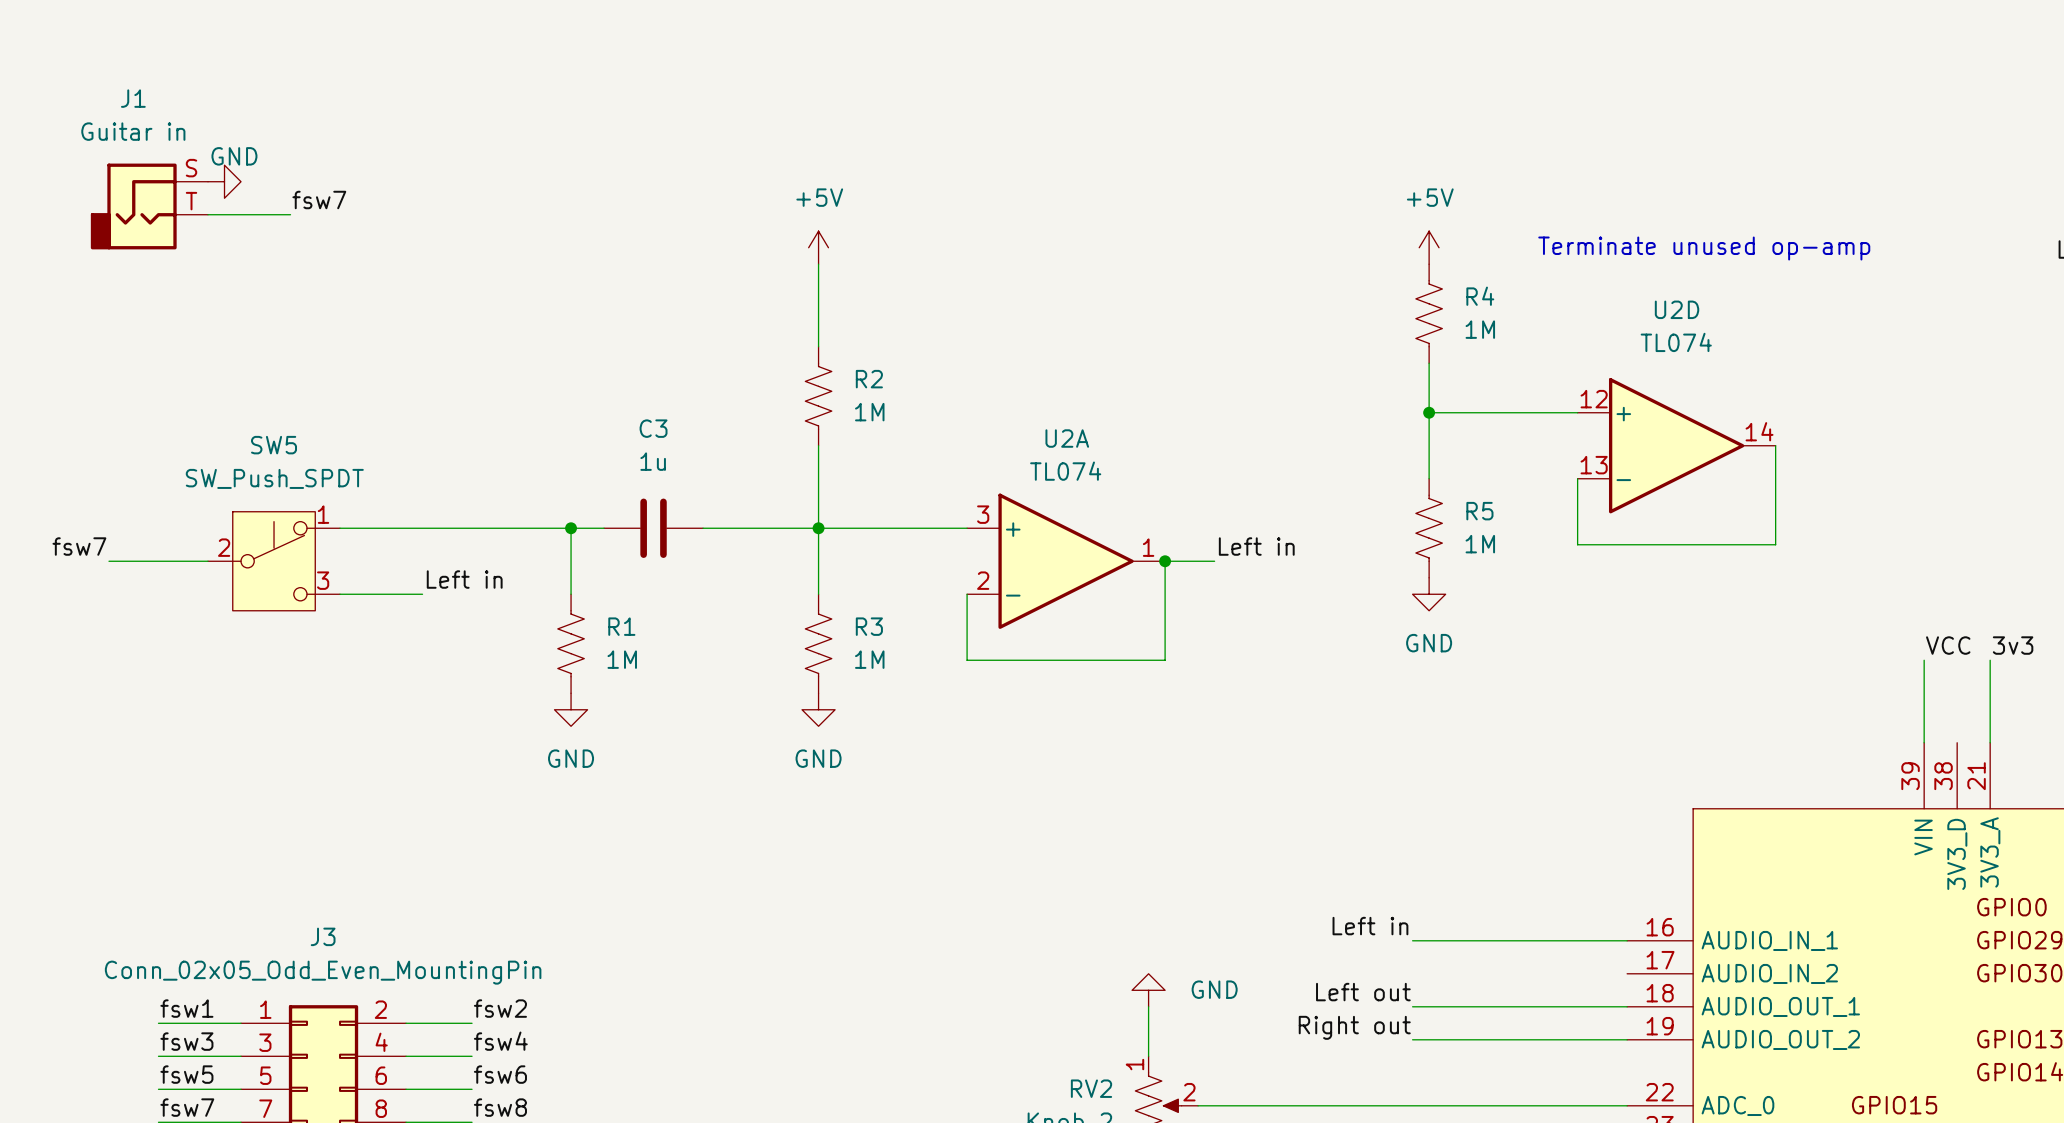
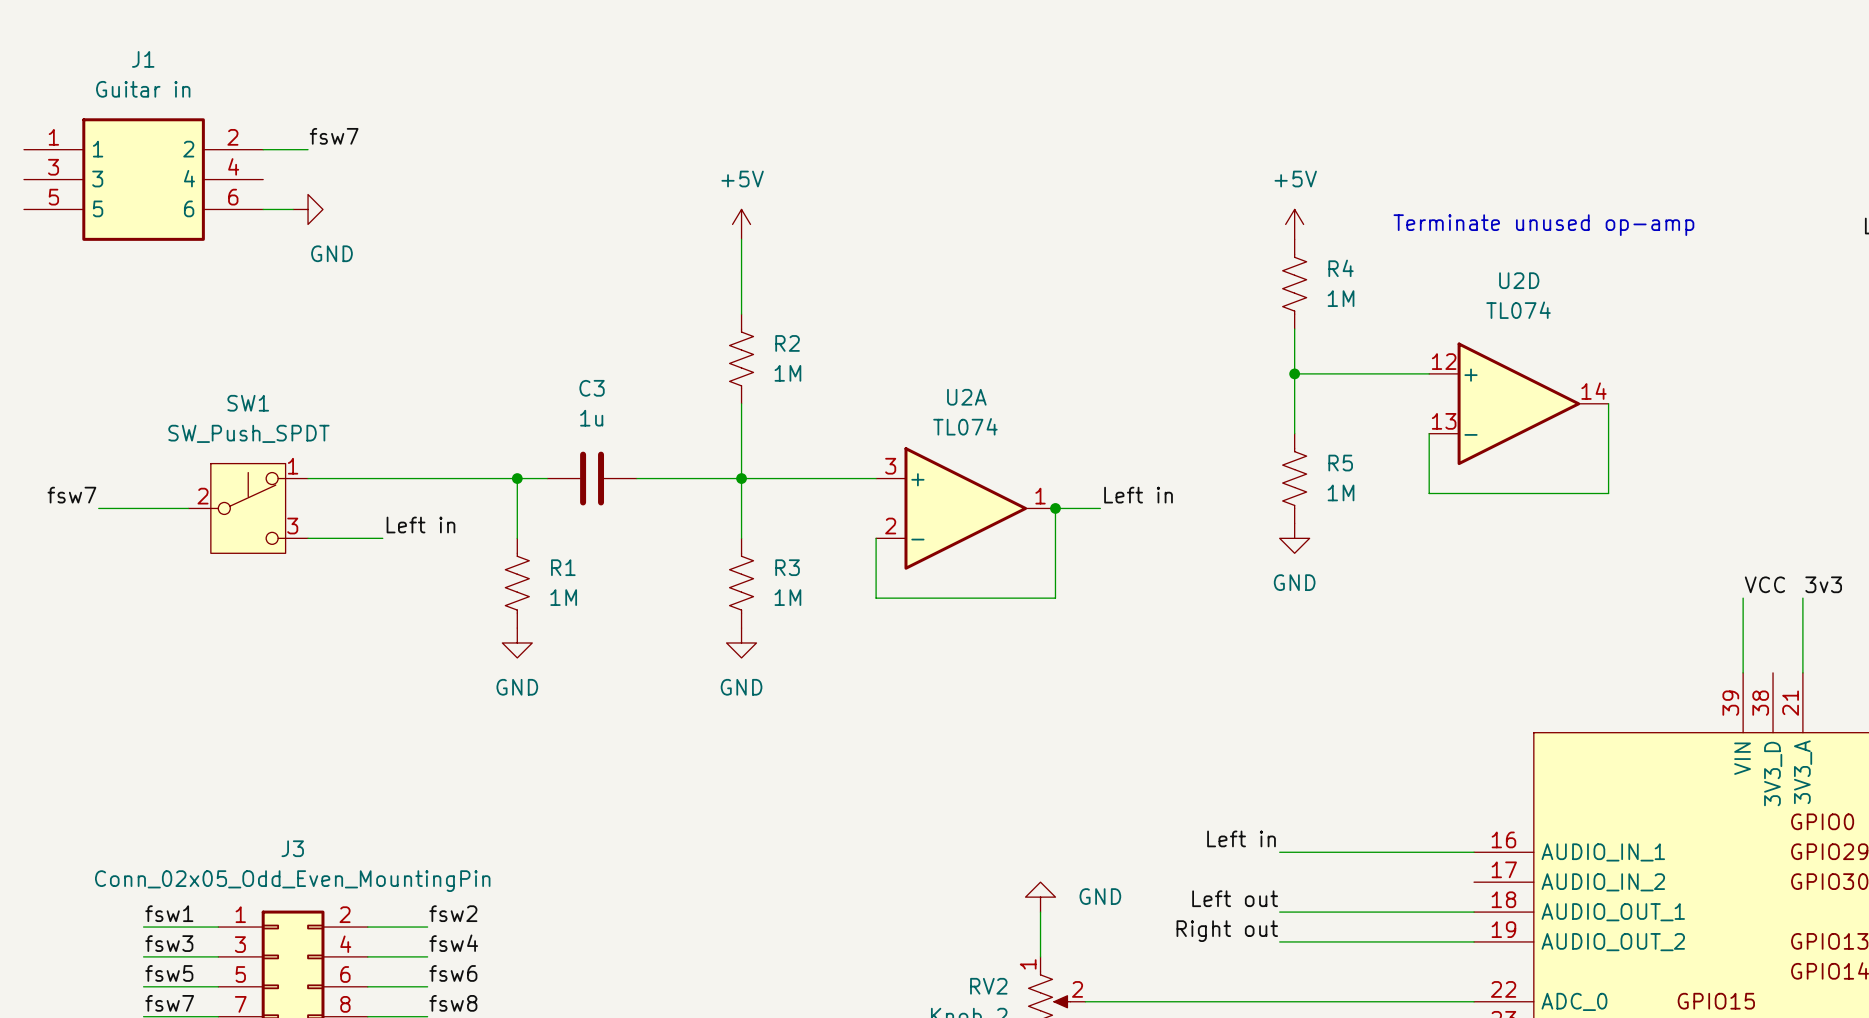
J1 name position: J1 (133, 98) -> J1 (143, 59)
J1 value position: Guitar in (133, 131) -> Guitar in (143, 89)
power symbol text position: GND (234, 156) -> GND (331, 253)
J1 symbol: [90, 163, 209, 250] -> [23, 118, 264, 241]
wire: none -> (263, 149) (308, 149)
power symbol position: GND (224, 181) -> GND (308, 209)
label position: fsw7 (319, 200) -> fsw7 (334, 136)
wire: (208, 214) (290, 214) -> none
wire: none -> (263, 209) (293, 209)
SW5 name: SW5 (274, 445) -> SW1 (248, 403)

